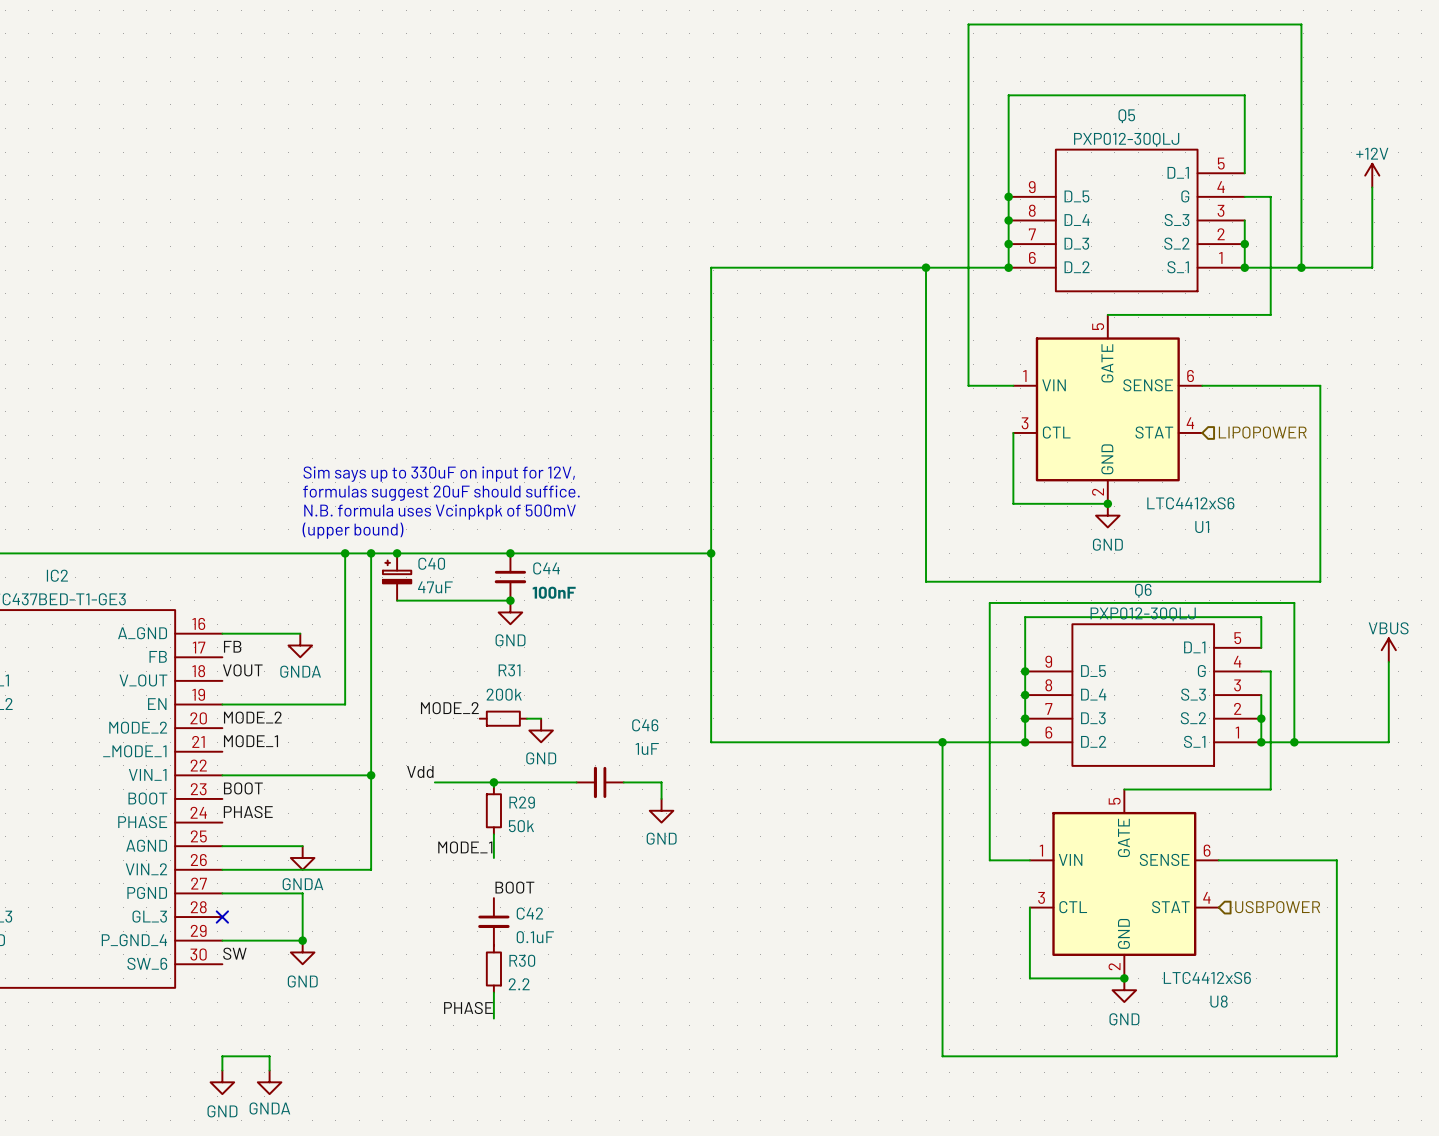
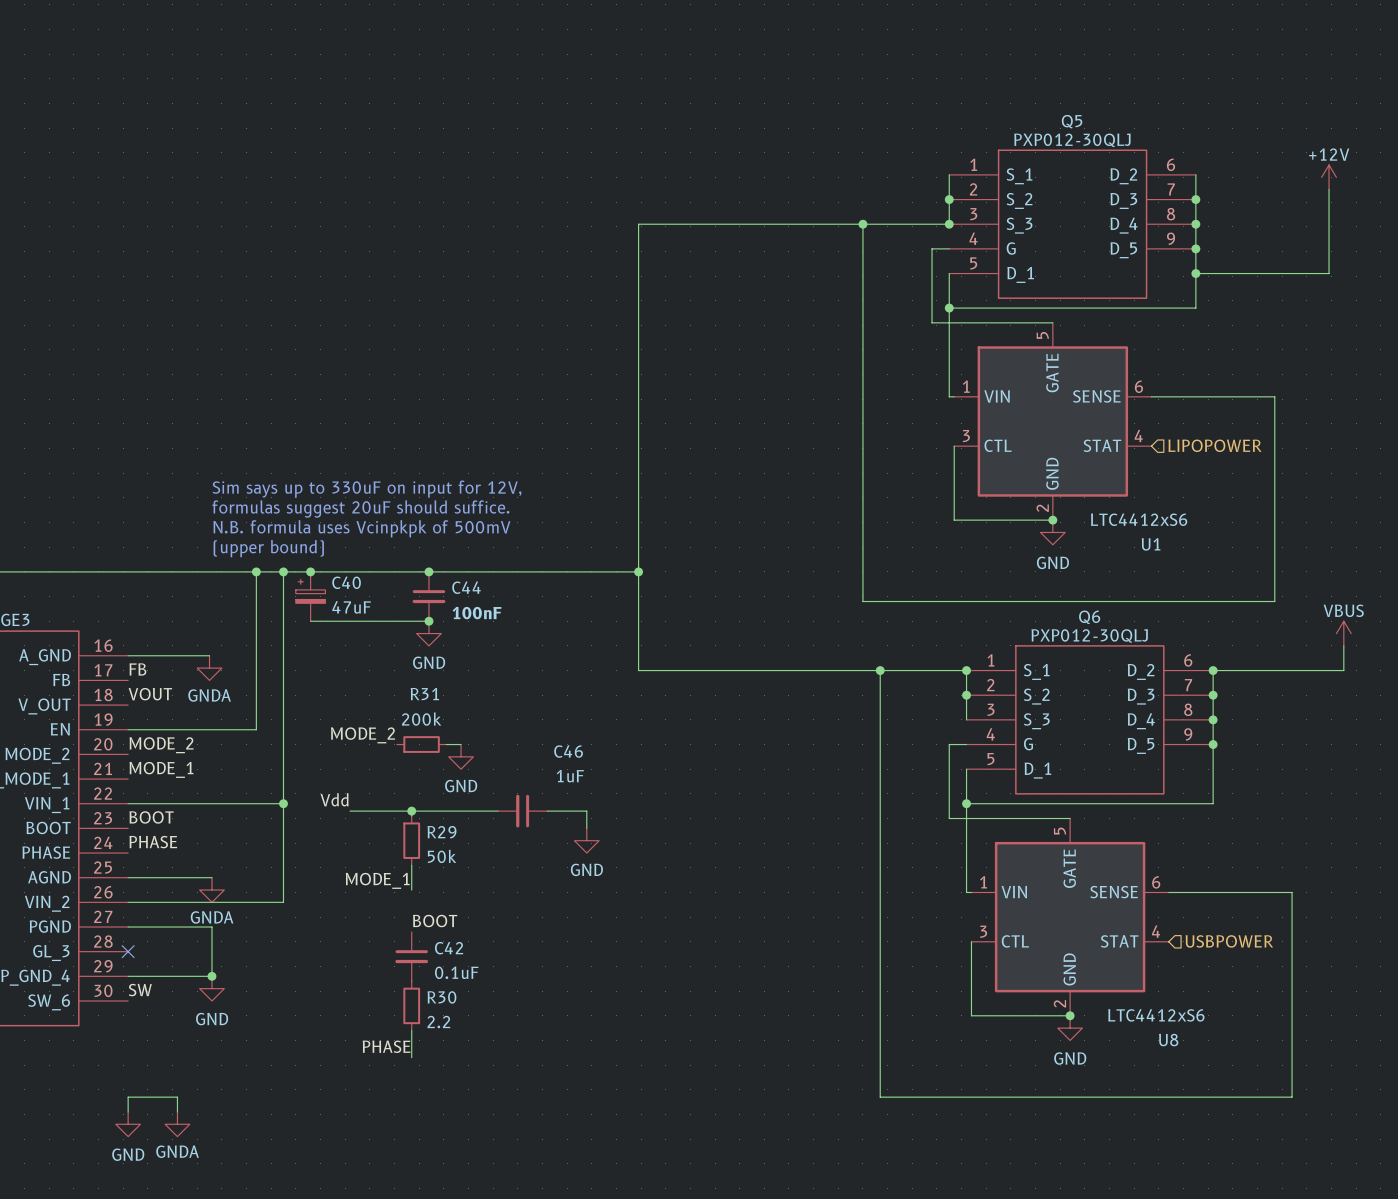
wire: (1008, 173) (1008, 95) (1244, 95) (1244, 173) -> (1195, 224) (1195, 174)
wire: (1244, 196) (1270, 196) (1270, 314) (1107, 314) -> (949, 248) (932, 248) (932, 322) (1052, 322)
junction: none -> (1195, 199)
wire: none -> (862, 224) (862, 273)
junction: none -> (862, 224)
wire: (1008, 220) (1008, 267) (711, 267) -> (949, 224) (638, 224) (638, 273)
Q5 rotation: 0° (1126, 220) -> 180° (1072, 224)
junction: none -> (1195, 224)
junction: (1008, 244) -> none
junction: (926, 267) -> none
junction: (1008, 267) -> none
wire: none -> (1195, 273) (1195, 308) (949, 308)
wire: (1301, 267) (1301, 24) (968, 24) (968, 385) (1008, 385) -> (949, 273) (949, 396)
junction: (1301, 267) -> none
junction: none -> (949, 308)
wire: none -> (1343, 645) (1343, 670) (1213, 670) (1213, 719)
wire: (711, 647) (711, 742) (1025, 742) (1025, 695) -> (638, 670) (966, 670)
wire: none -> (880, 670) (880, 769)
junction: none -> (880, 670)
wire: (1025, 647) (1025, 617) (1261, 617) (1261, 647) -> none
junction: none -> (966, 670)
junction: none -> (1213, 670)
power symbol position: VBUS (1388, 650) -> VBUS (1343, 633)
wire: (1388, 662) (1388, 742) (1261, 742) -> (966, 803) (1213, 803) (1213, 769)
wire: (1261, 671) (1270, 671) (1270, 789) (1124, 789) -> (966, 744) (949, 744) (949, 818) (1070, 818)
junction: none -> (1213, 695)
junction: (1025, 695) -> none
Q6 rotation: 0° (1143, 695) -> 180° (1089, 719)
junction: none -> (1213, 719)
junction: (1025, 718) -> none
junction: (942, 742) -> none
junction: (1025, 742) -> none
junction: (1261, 742) -> none
wire: (1294, 742) (1294, 602) (989, 602) (989, 860) (1025, 860) -> (966, 769) (966, 892)
junction: (1294, 742) -> none
junction: none -> (966, 803)

